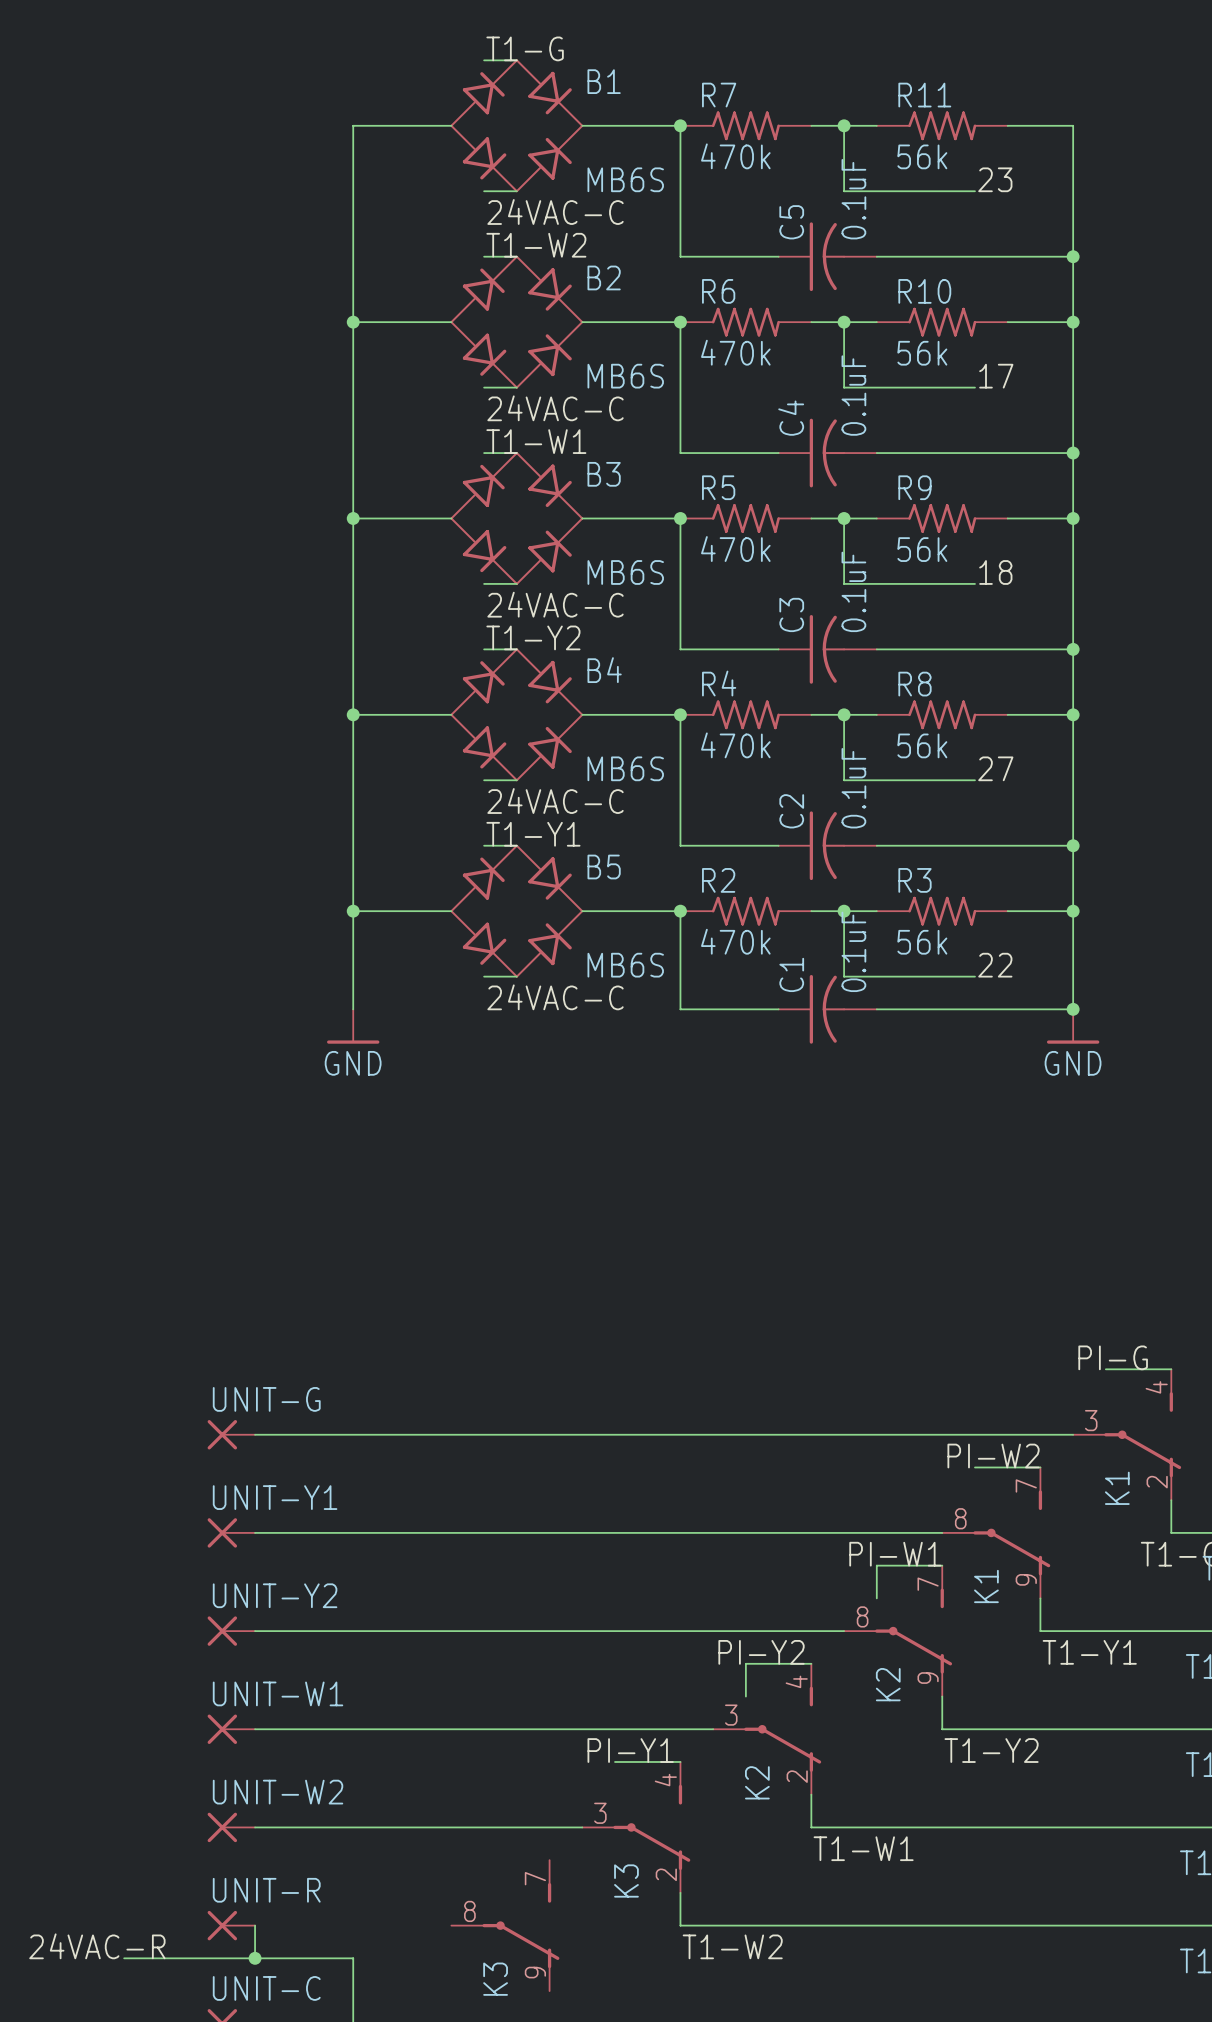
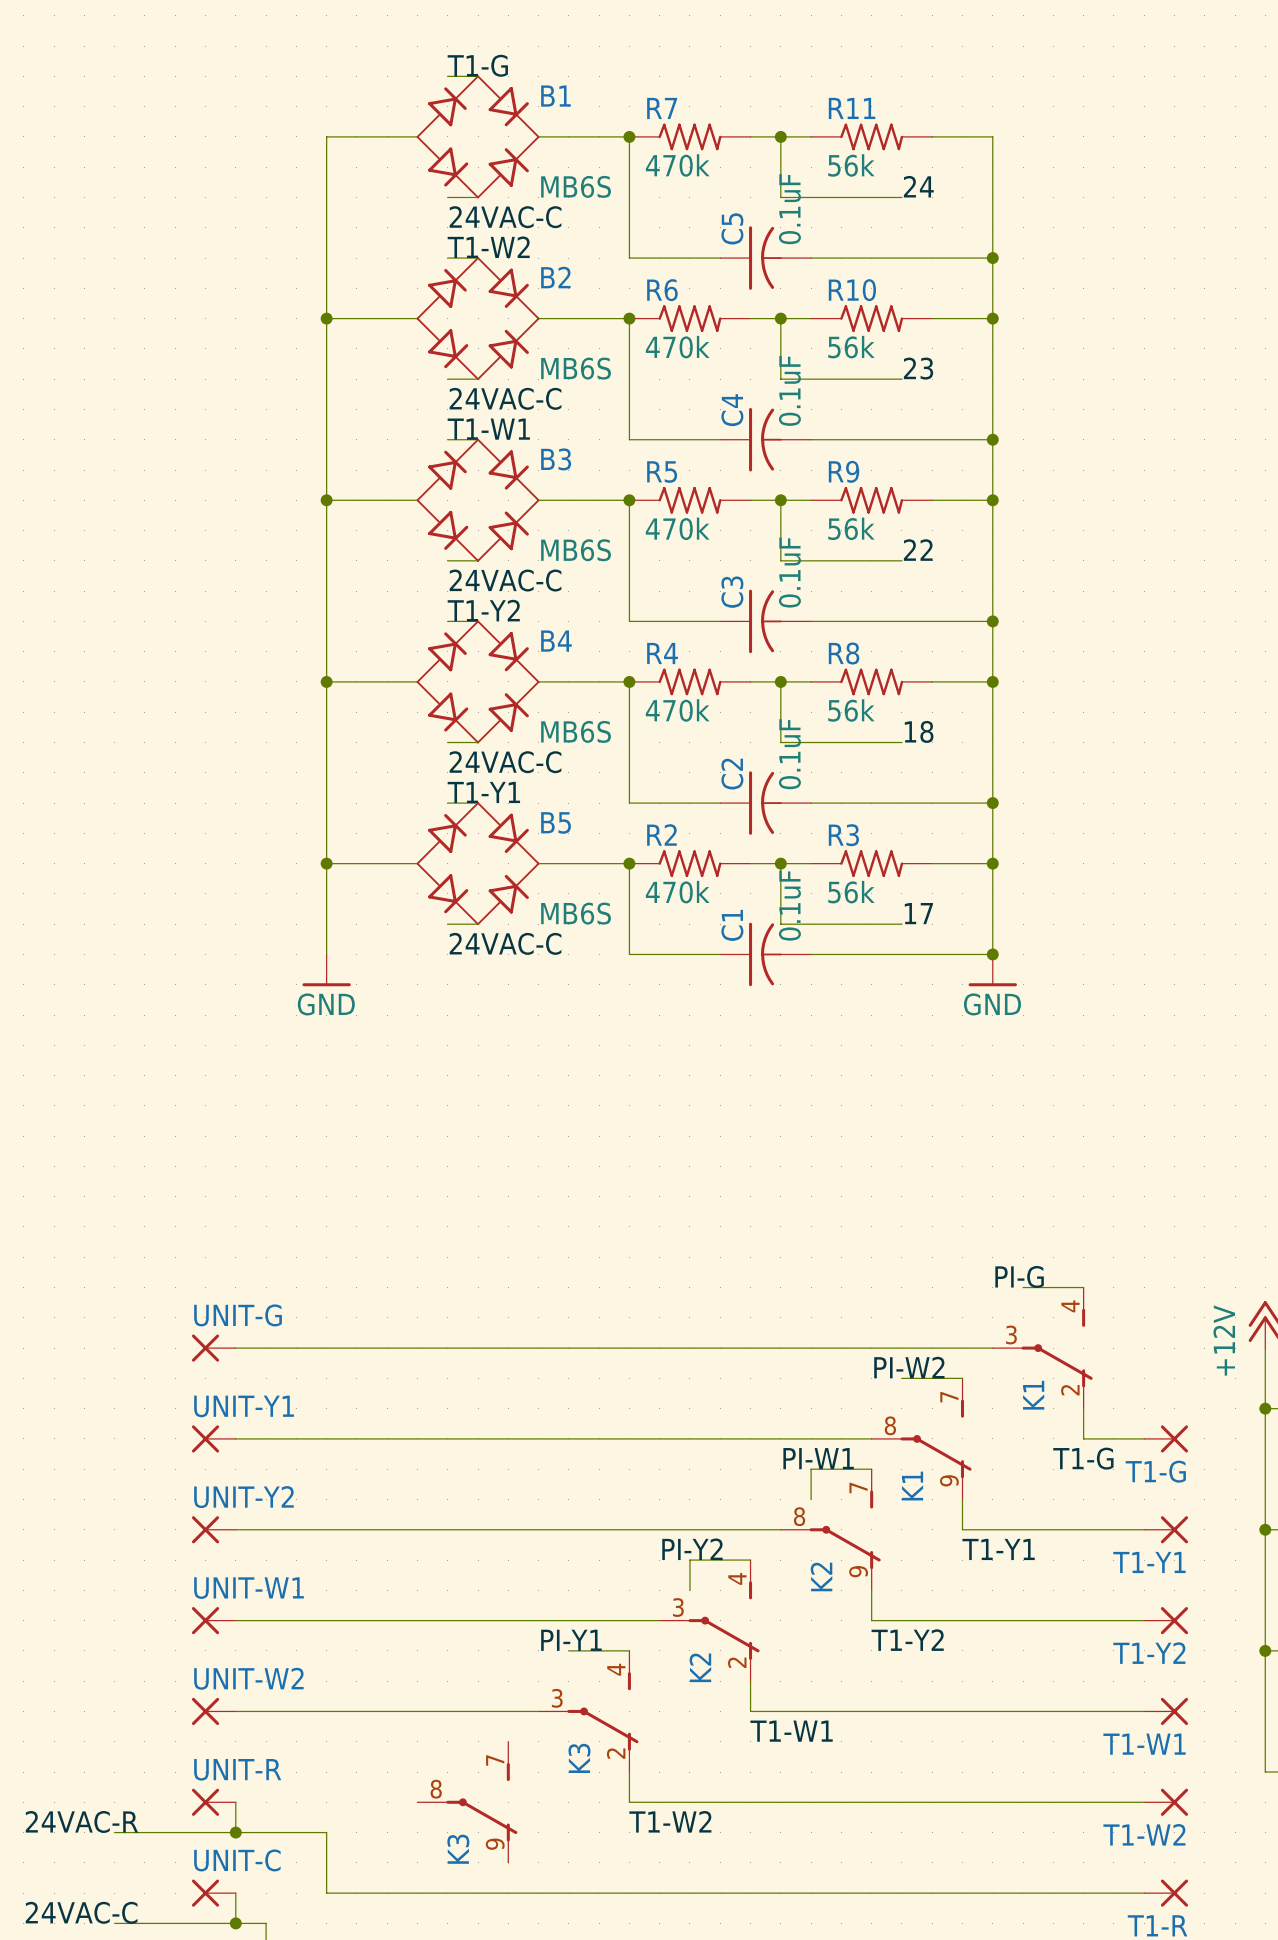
label: 23 (995, 179) -> 24 (918, 186)
label: 17 (996, 376) -> 23 (918, 368)
label: 18 (995, 572) -> 22 (918, 550)
label: 27 (995, 768) -> 18 (919, 731)
label: 22 (995, 965) -> 17 (918, 913)

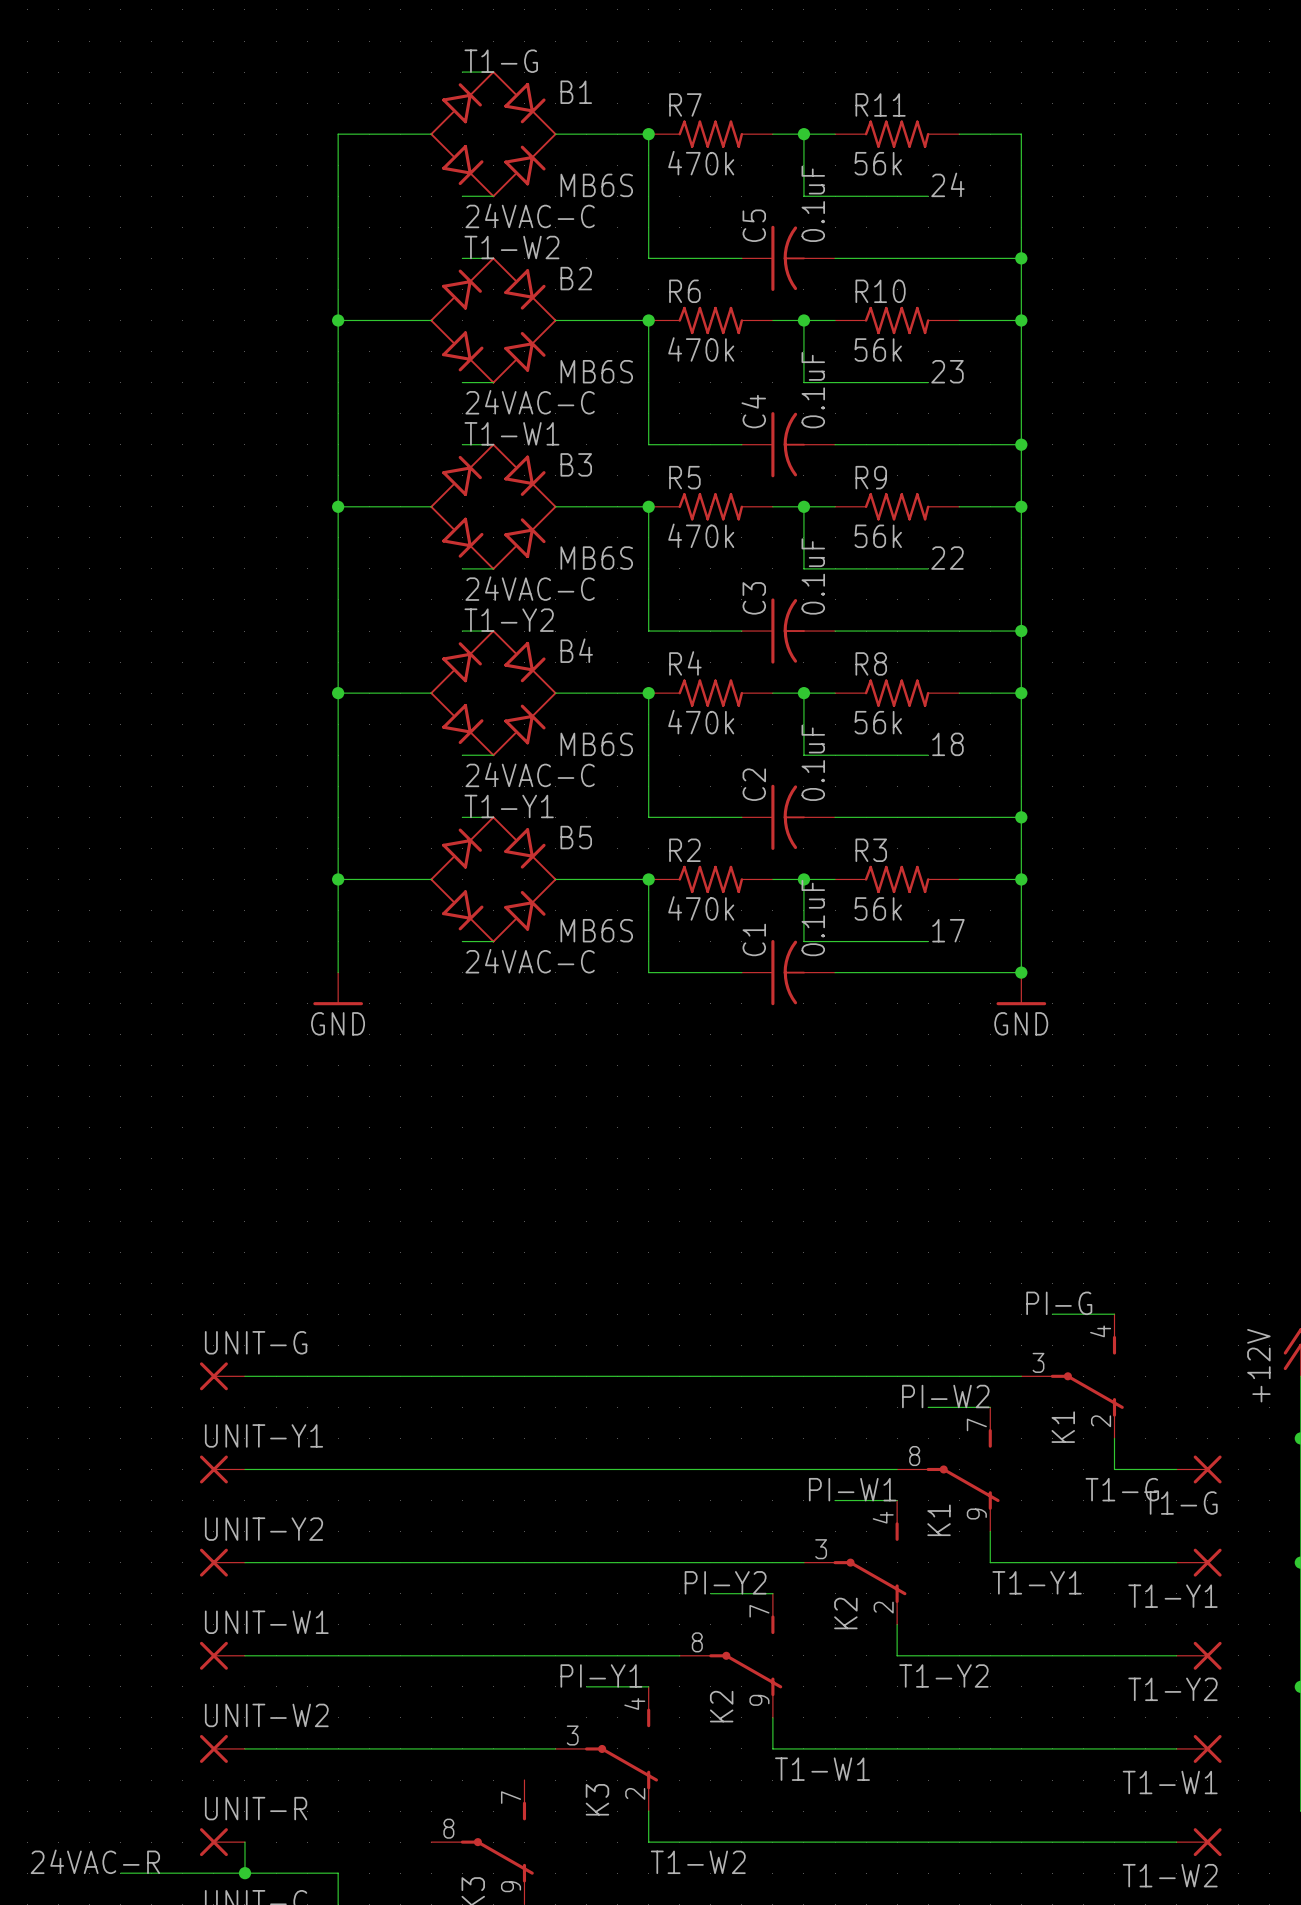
wire: (811, 1469) (811, 1499) -> none
K2 pin number: 7 (858, 1487) -> 4 (883, 1517)
K2 pin number: 8 (799, 1516) -> 3 (821, 1549)
wire: (689, 1560) (689, 1590) -> none
K2 pin number: 9 (858, 1571) -> 2 (883, 1607)
K2 pin number: 4 (737, 1578) -> 7 (759, 1611)
K2 pin number: 3 (678, 1607) -> 8 (697, 1642)
K2 pin number: 2 (737, 1662) -> 9 (759, 1700)

